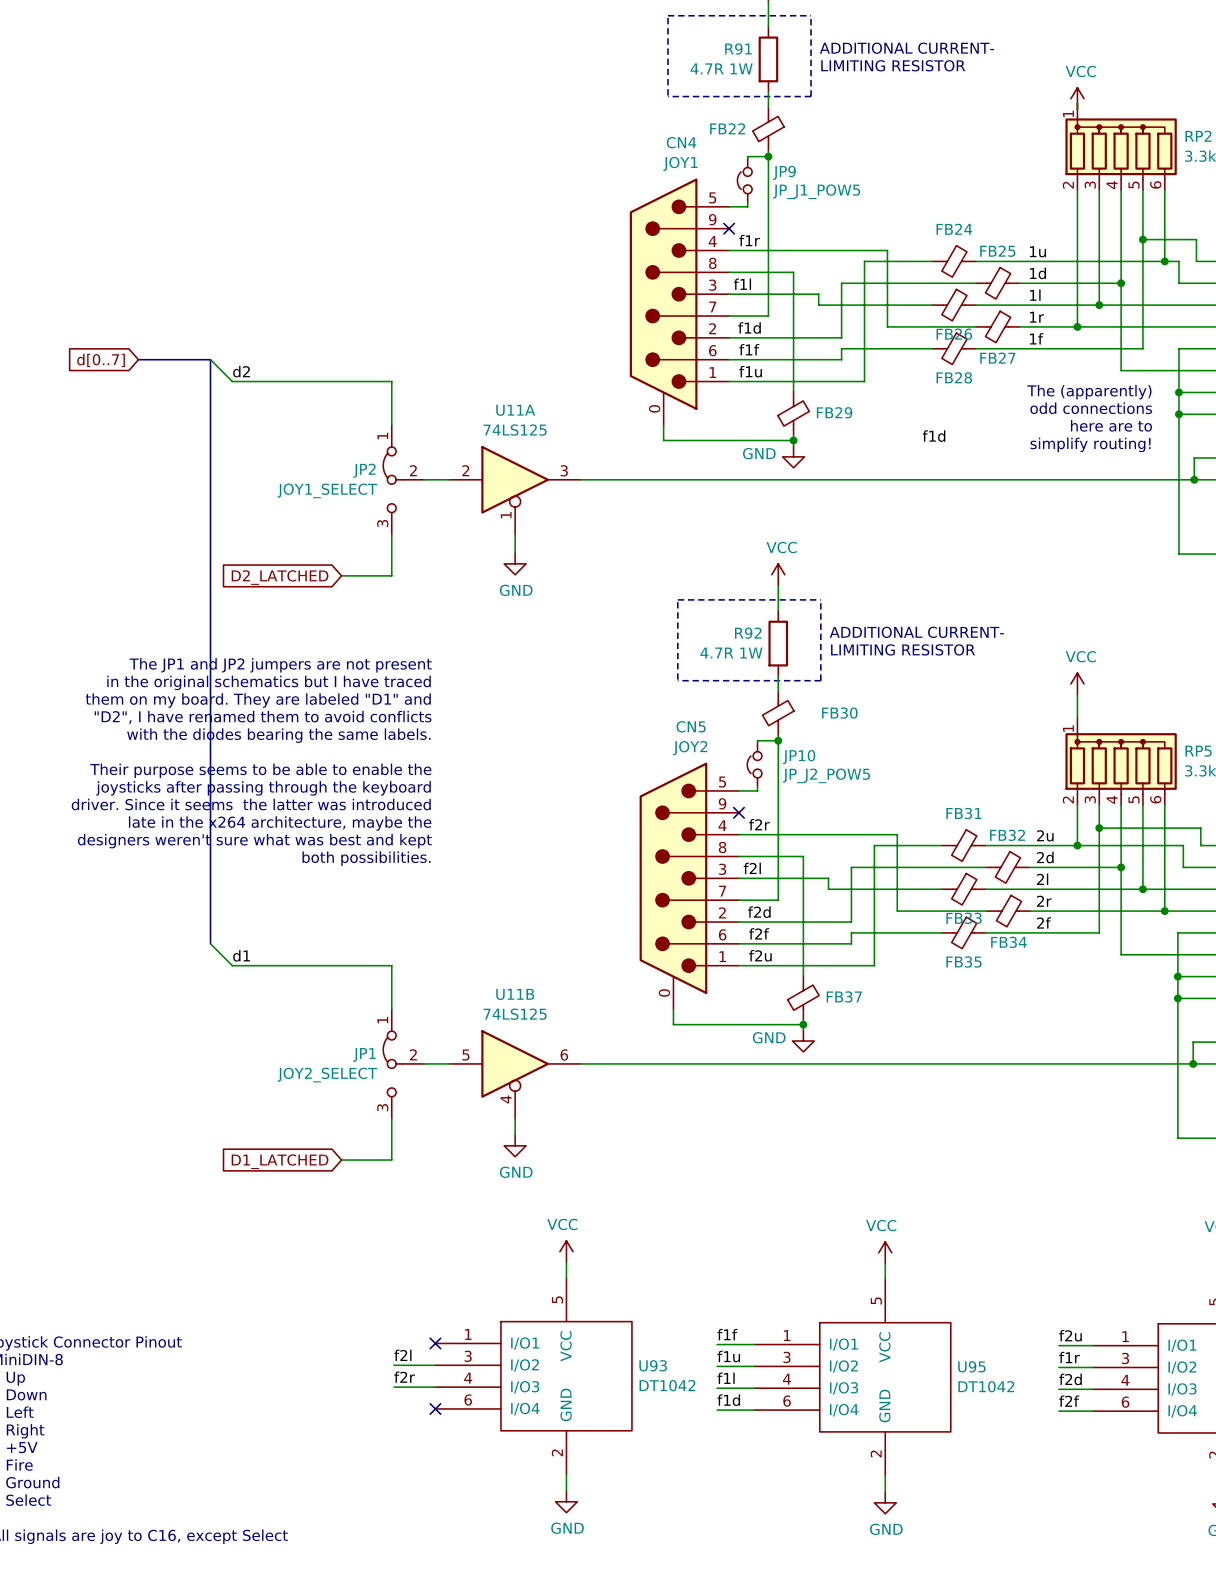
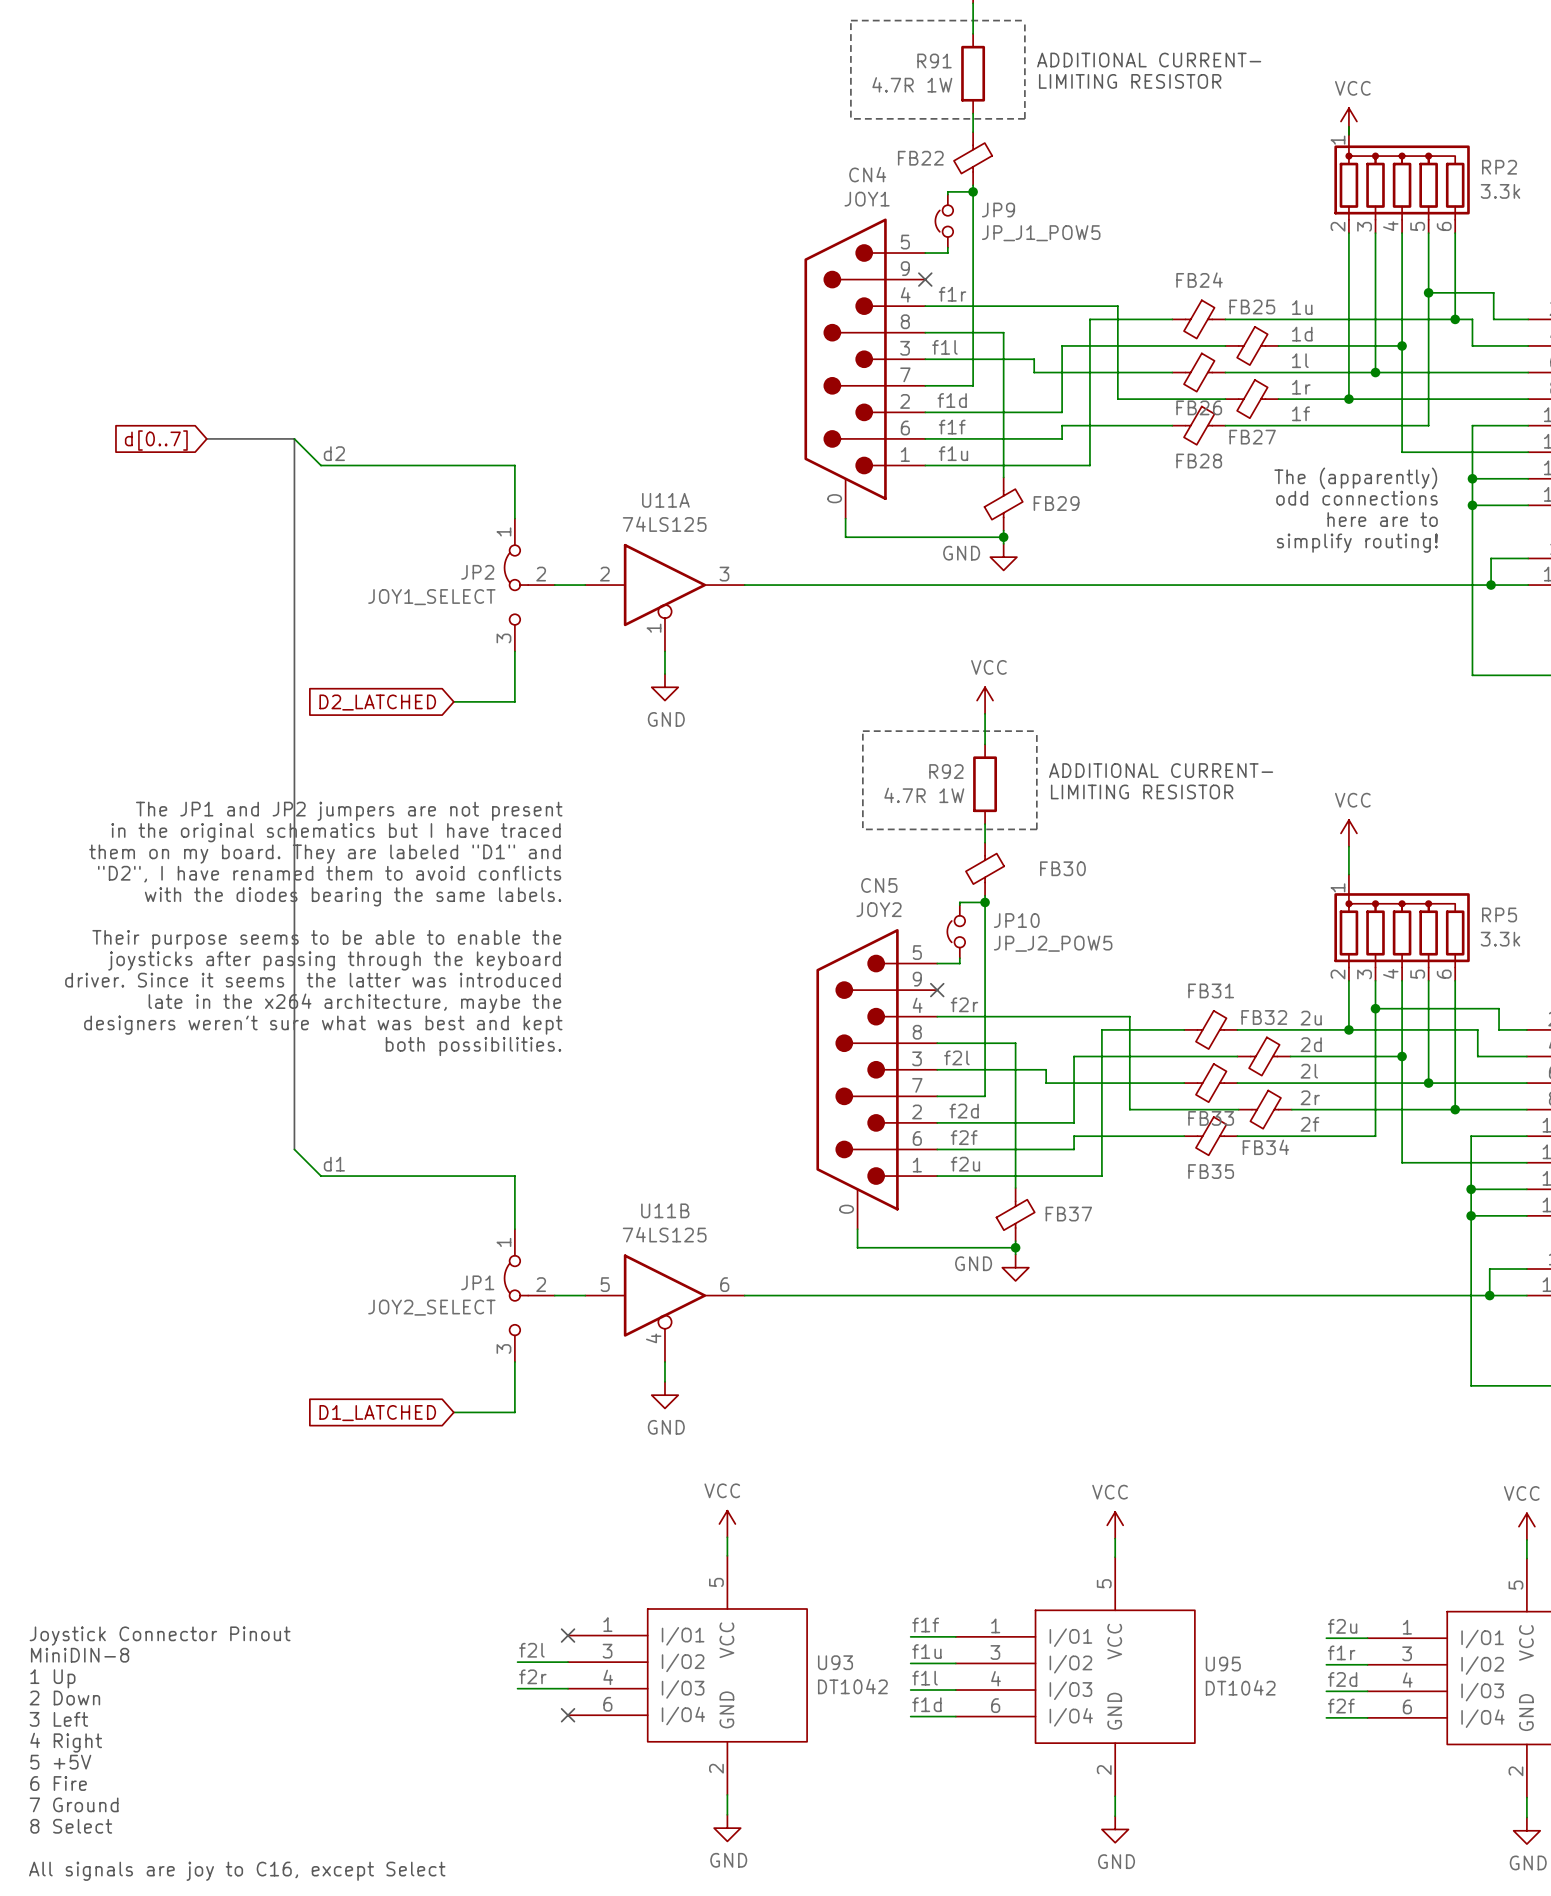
label: f1d (934, 436) -> none

